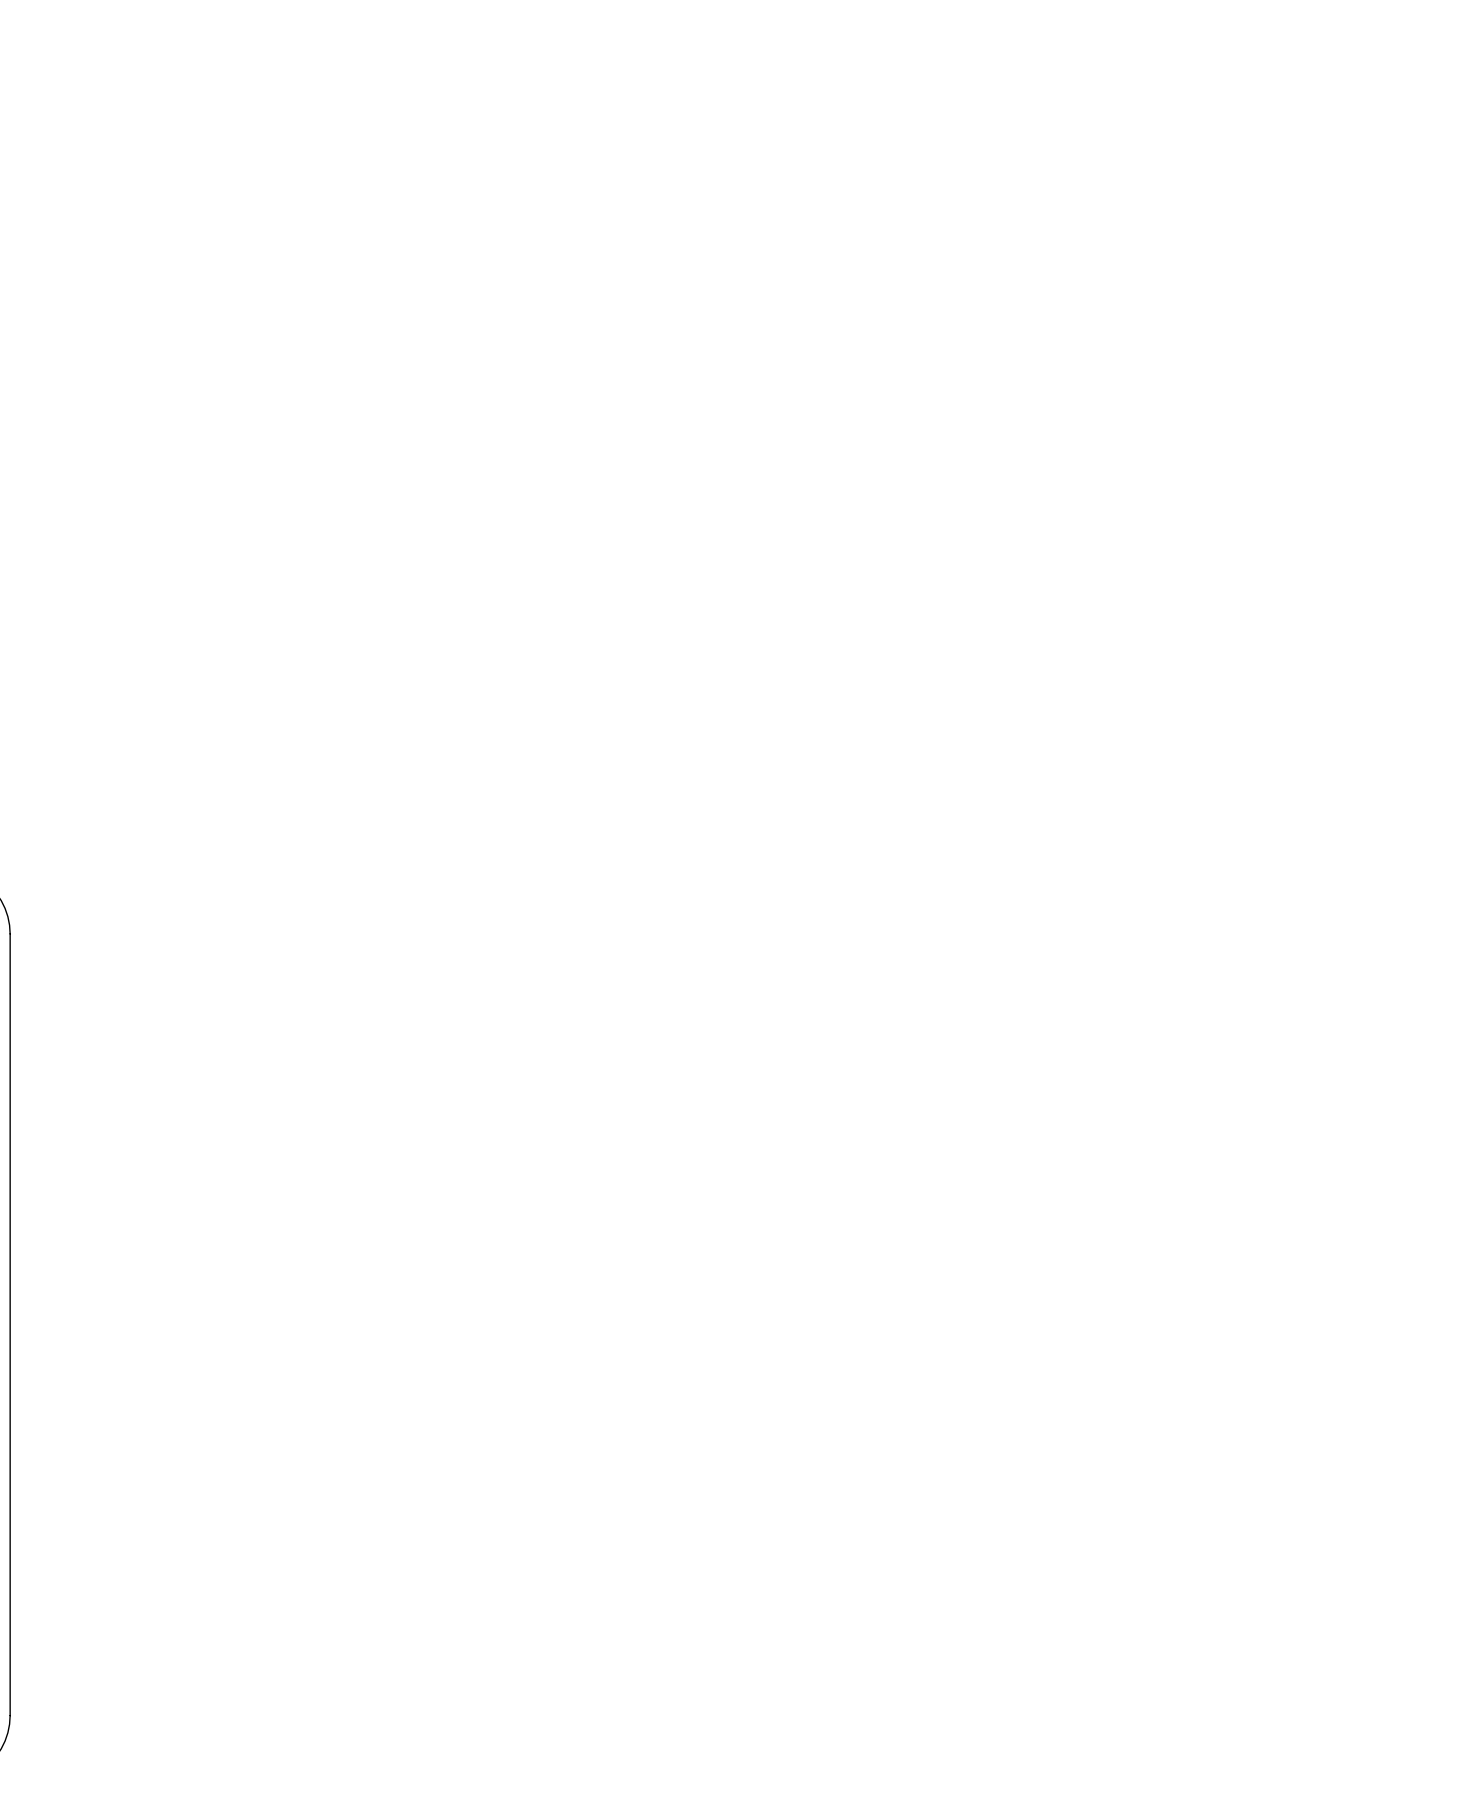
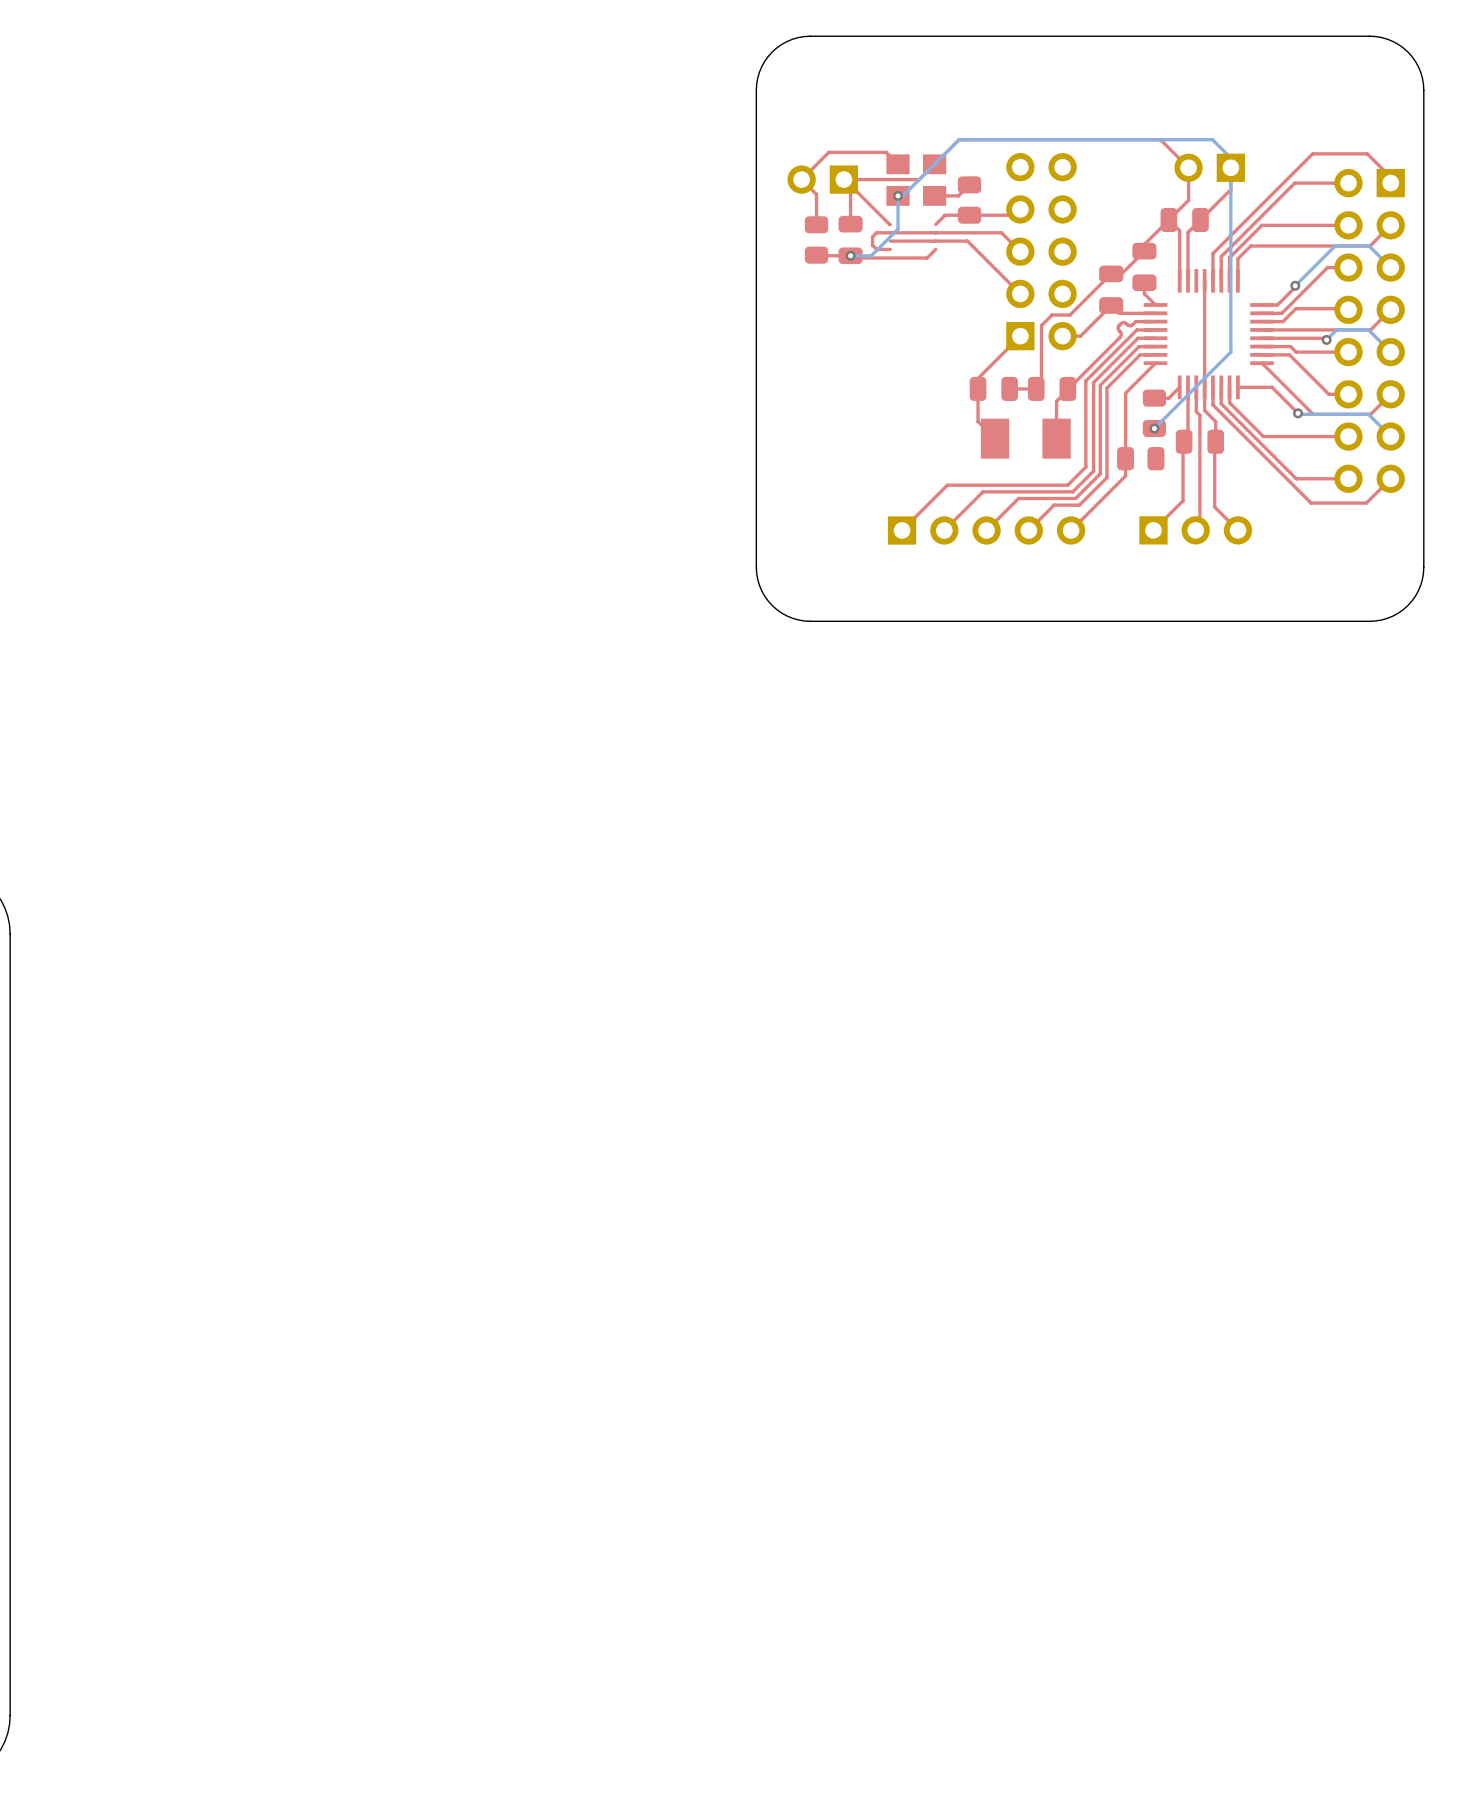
board edge: none -> (1369, 36) (810, 36) (786, 41) (772, 52) (759, 72) (756, 90) (756, 567) (761, 590) (772, 605) (792, 618) (810, 621) (1369, 621) (1387, 618) (1407, 605) (1418, 590) (1423, 567) (1423, 84) (1418, 66) (1403, 48) (1387, 39) (1369, 36)
top track: none -> (898, 164) (886, 152) (828, 152) (801, 179) (816, 194) (816, 224)
part: none -> (1209, 167)
top track: none -> (1230, 167) (1230, 189) (1188, 232) (1188, 280)
part: none -> (822, 179)
top track: none -> (844, 179) (890, 224)
part: none -> (916, 180)
top track: none -> (1348, 183) (1294, 183) (1221, 256) (1221, 280)
top track: none -> (1390, 183) (1390, 177) (1367, 153) (1312, 153) (1212, 253) (1212, 280)
top track: none -> (969, 184) (958, 195) (934, 195)
via: none -> (898, 195)
part: none -> (969, 200)
top track: none -> (1020, 209) (1014, 215) (945, 215) (935, 224)
top track: none -> (1168, 219) (1179, 230) (1179, 280)
part: none -> (1184, 219)
top track: none -> (850, 224) (850, 186) (843, 179) (919, 179) (959, 139) (1160, 139) (1188, 167) (1188, 200) (1144, 244) (1144, 251) (1121, 273) (1111, 273) (1070, 315) (1052, 315) (1041, 325) (1041, 383) (1036, 388) (1009, 388)
top track: none -> (1348, 225) (1262, 225) (1229, 257) (1229, 280)
top track: none -> (1390, 225) (1370, 246) (1250, 246) (1237, 258) (1237, 280)
part: none -> (816, 239)
part: none -> (850, 239)
top track: none -> (890, 241) (967, 241) (1020, 293)
top track: none -> (890, 249) (876, 249) (872, 245) (872, 236) (876, 232) (1001, 232) (1020, 251)
top track: none -> (935, 249) (927, 258) (852, 258) (850, 255) (816, 255)
part: none -> (1041, 251)
bottom track: none -> (850, 255) (871, 255) (898, 229) (898, 195) (902, 195) (959, 139) (1212, 139) (1230, 157) (1230, 352) (1154, 428)
via: none -> (850, 255)
part: none -> (1144, 266)
top track: none -> (1348, 267) (1327, 267) (1281, 313) (1262, 313)
bottom track: none -> (1390, 267) (1369, 246) (1335, 246) (1295, 285)
top track: none -> (1204, 280) (1204, 410) (1215, 421) (1214, 507) (1237, 530)
top track: none -> (1144, 282) (1144, 293) (1155, 305)
top track: none -> (1295, 285) (1277, 305) (1262, 305)
via: none -> (1295, 285)
part: none -> (1111, 289)
top track: none -> (1348, 309) (1295, 308) (1282, 321) (1262, 321)
top track: none -> (1390, 309) (1370, 329) (1262, 329)
top track: none -> (1155, 313) (1119, 313) (1111, 305) (1080, 336) (1062, 336)
top track: none -> (1155, 321) (1135, 321) (1130, 325) (1123, 322) (1119, 325) (1120, 336) (1056, 401) (1056, 438)
top track: none -> (1155, 329) (1136, 329) (1085, 381) (1085, 467) (1067, 485) (947, 485) (902, 530)
part: none -> (1369, 330)
part: none -> (1208, 334)
top track: none -> (1020, 336) (978, 378) (978, 421) (995, 438)
top track: none -> (1155, 338) (1137, 338) (1093, 382) (1093, 471) (1072, 491) (982, 491) (944, 530)
top track: none -> (1262, 338) (1324, 338) (1326, 339)
bottom track: none -> (1326, 339) (1336, 329) (1368, 329) (1390, 352)
via: none -> (1326, 339)
top track: none -> (1155, 346) (1139, 346) (1100, 385) (1100, 473) (1075, 498) (1018, 498) (986, 530)
top track: none -> (1262, 346) (1290, 346) (1296, 352) (1348, 352)
top track: none -> (1155, 354) (1140, 354) (1106, 388) (1106, 477) (1079, 505) (1054, 505) (1028, 530)
top track: none -> (1262, 354) (1289, 354) (1328, 394) (1348, 394)
top track: none -> (1155, 363) (1125, 393) (1125, 475) (1071, 530)
top track: none -> (1262, 363) (1313, 414) (1370, 414) (1390, 394)
top track: none -> (1179, 387) (1168, 398) (1154, 398)
top track: none -> (1188, 387) (1188, 437) (1183, 442) (1183, 500) (1153, 530)
top track: none -> (1196, 387) (1196, 411) (1199, 415) (1199, 526) (1195, 530)
top track: none -> (1212, 387) (1212, 404) (1311, 503) (1366, 503) (1390, 478)
top track: none -> (1221, 387) (1221, 403) (1296, 478) (1348, 478)
top track: none -> (1229, 387) (1229, 402) (1263, 436) (1348, 436)
top track: none -> (1237, 387) (1272, 387) (1298, 413)
part: none -> (993, 388)
part: none -> (1052, 388)
part: none -> (1154, 413)
bottom track: none -> (1298, 413) (1368, 414) (1390, 436)
via: none -> (1298, 413)
via: none -> (1154, 428)
part: none -> (1025, 438)
part: none -> (1199, 441)
part: none -> (1140, 458)
part: none -> (986, 530)
part: none -> (1195, 530)

